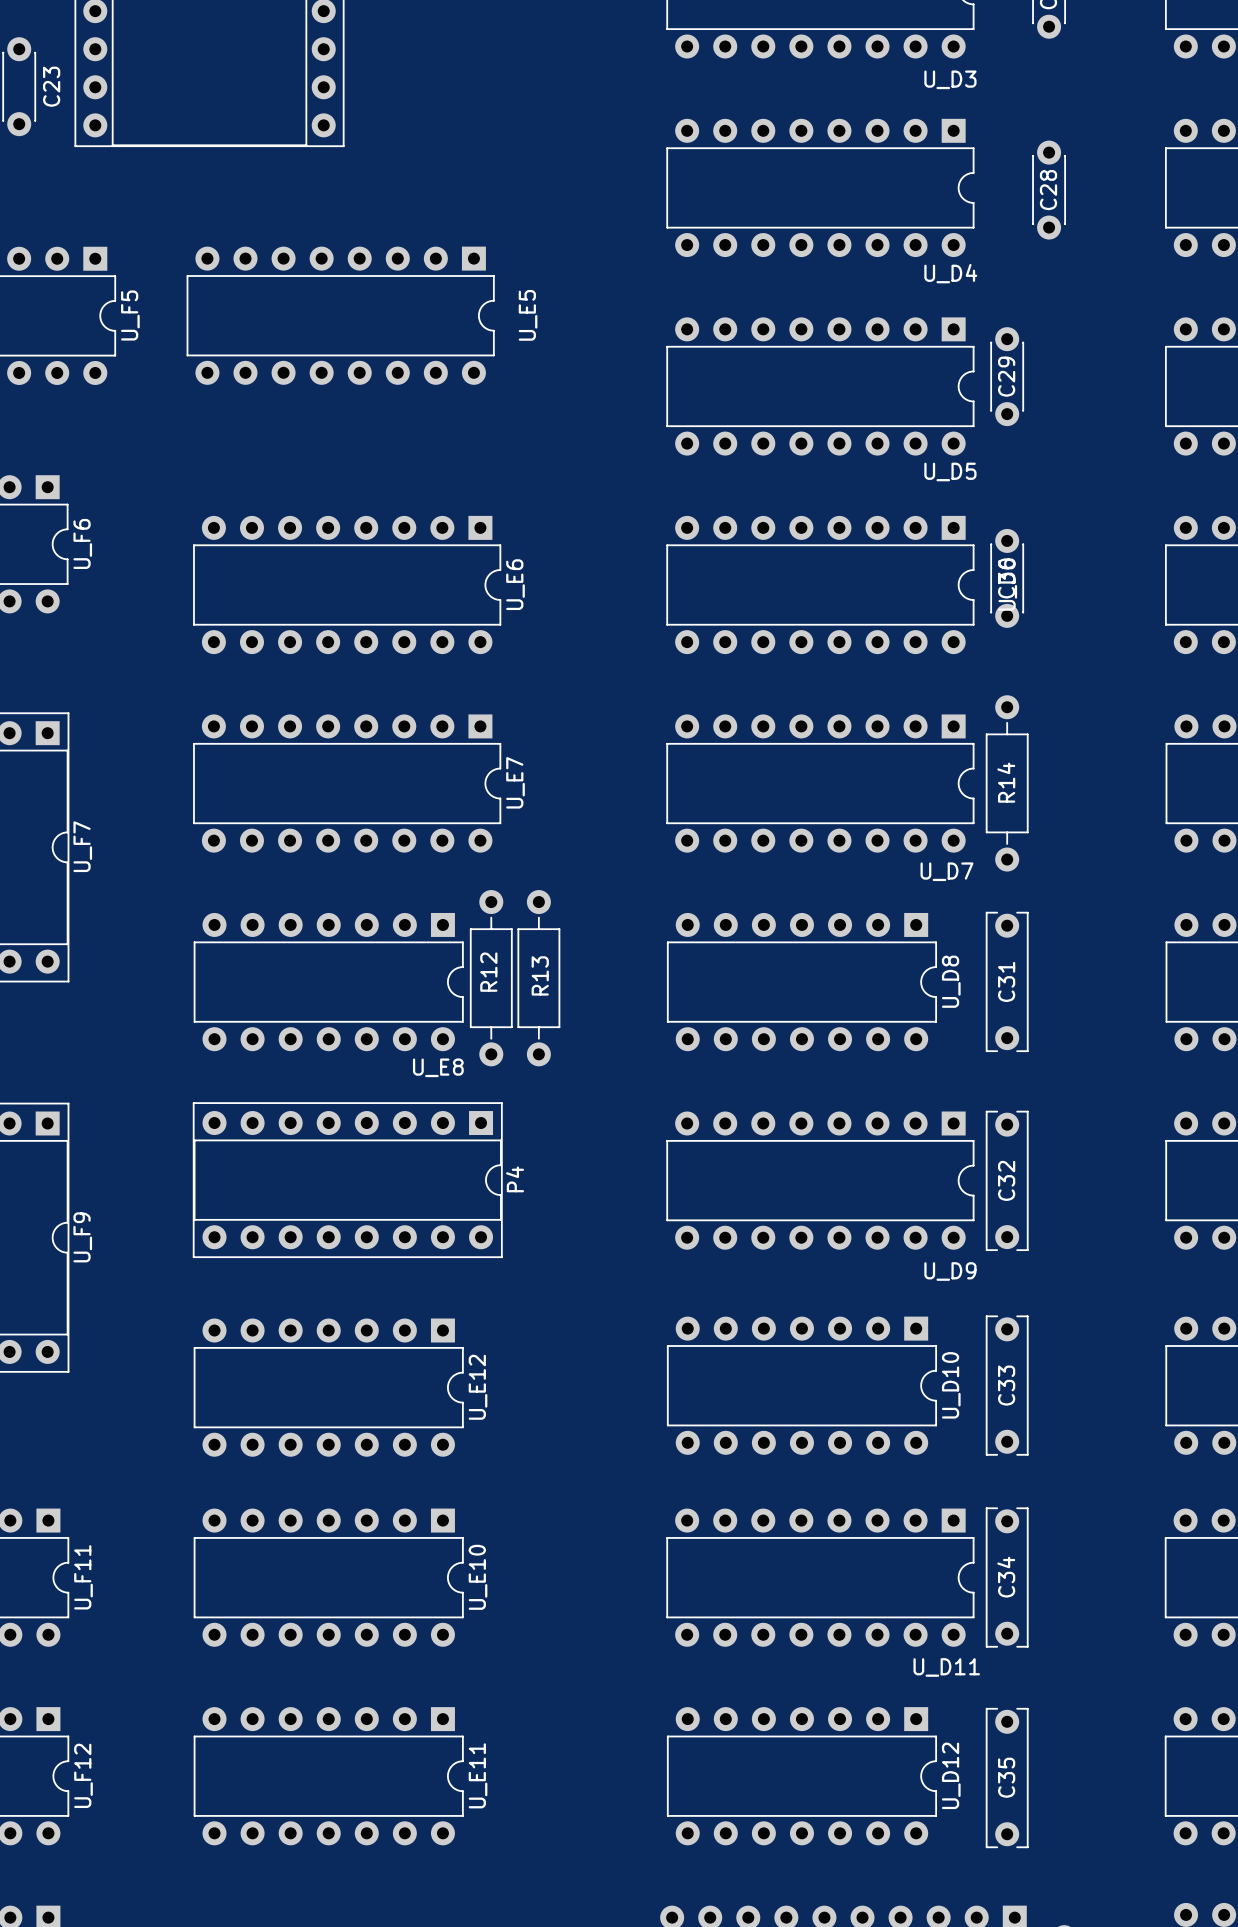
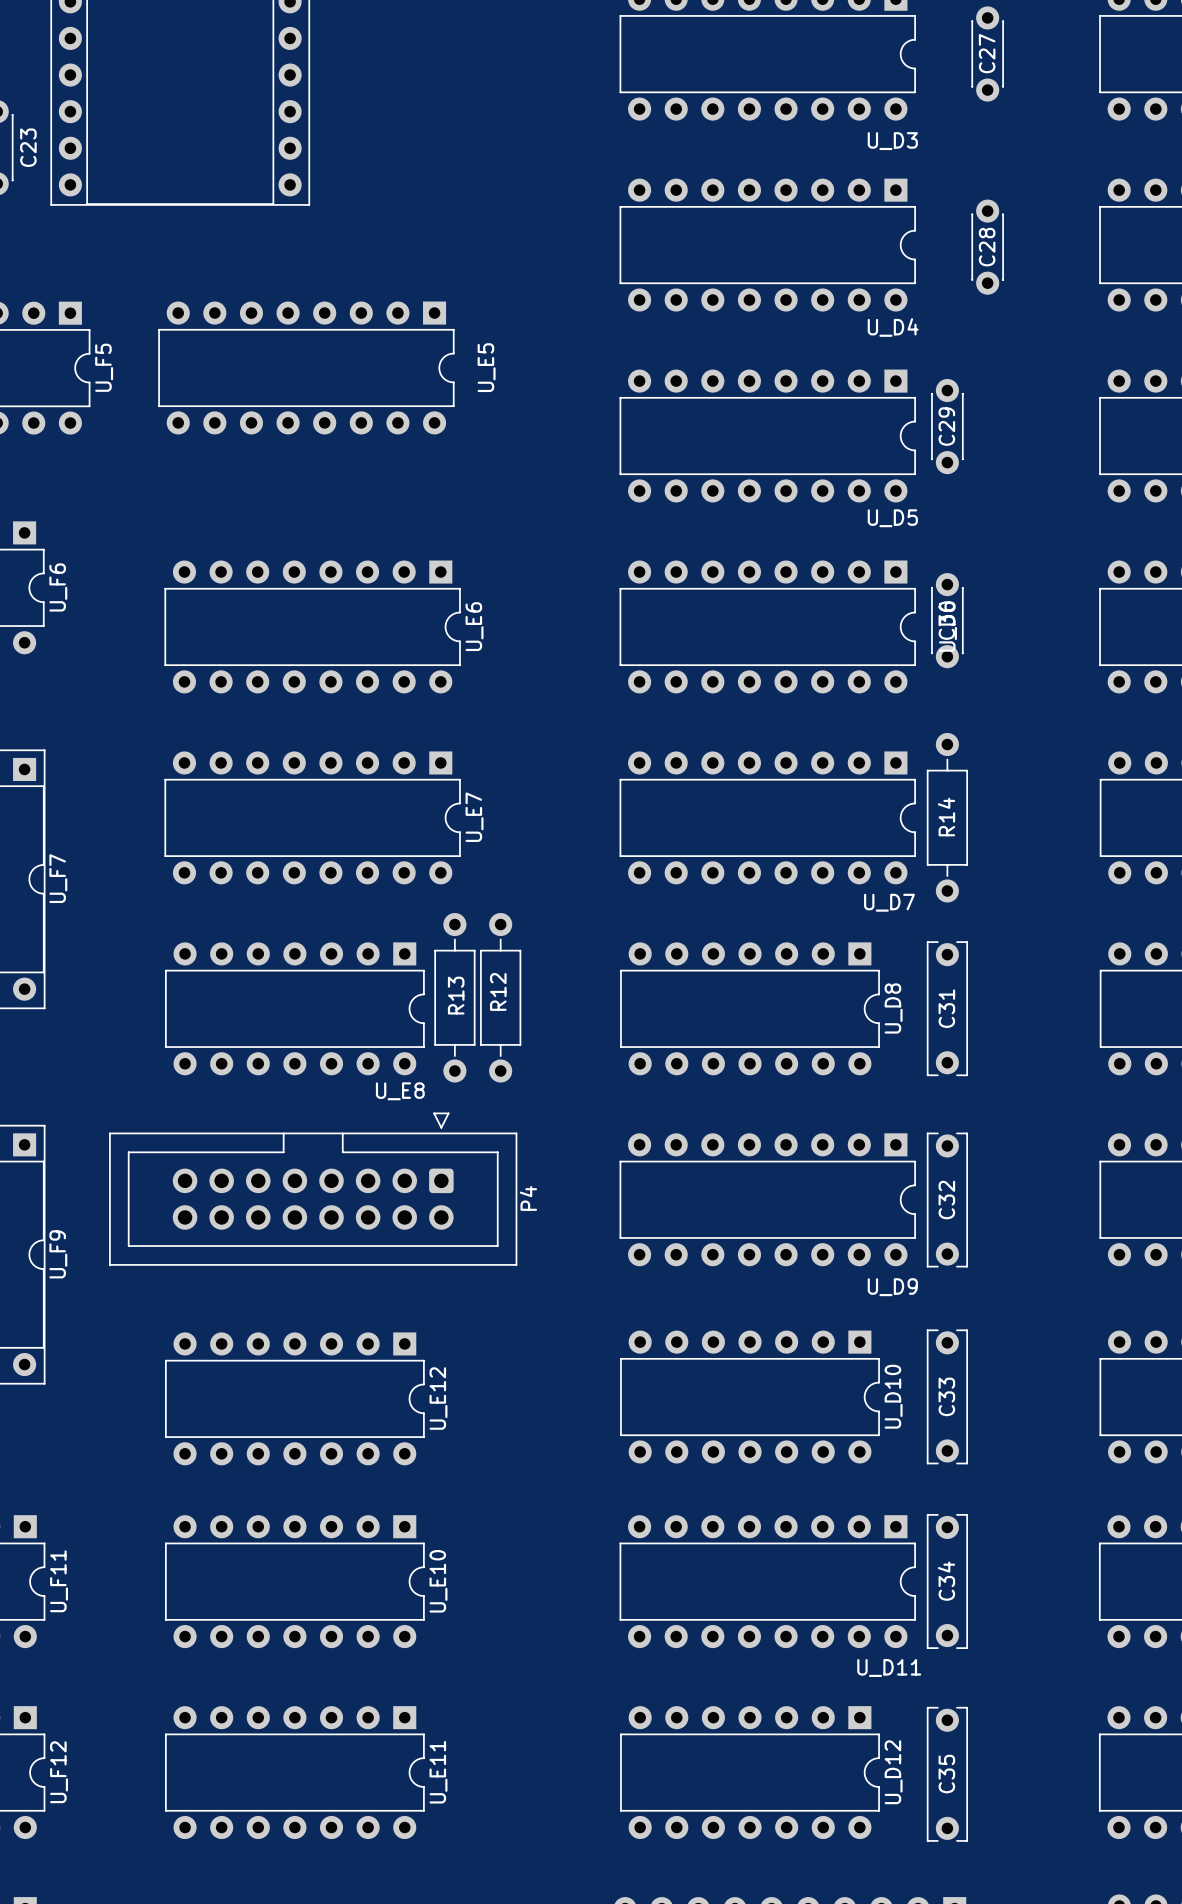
R12 position: (491, 978) -> (500, 997)
R13 position: (538, 978) -> (454, 997)
P4 footprint: [192, 1102, 503, 1259] -> [109, 1112, 518, 1266]
P4 name position: P4 (515, 1179) -> P4 (528, 1198)

